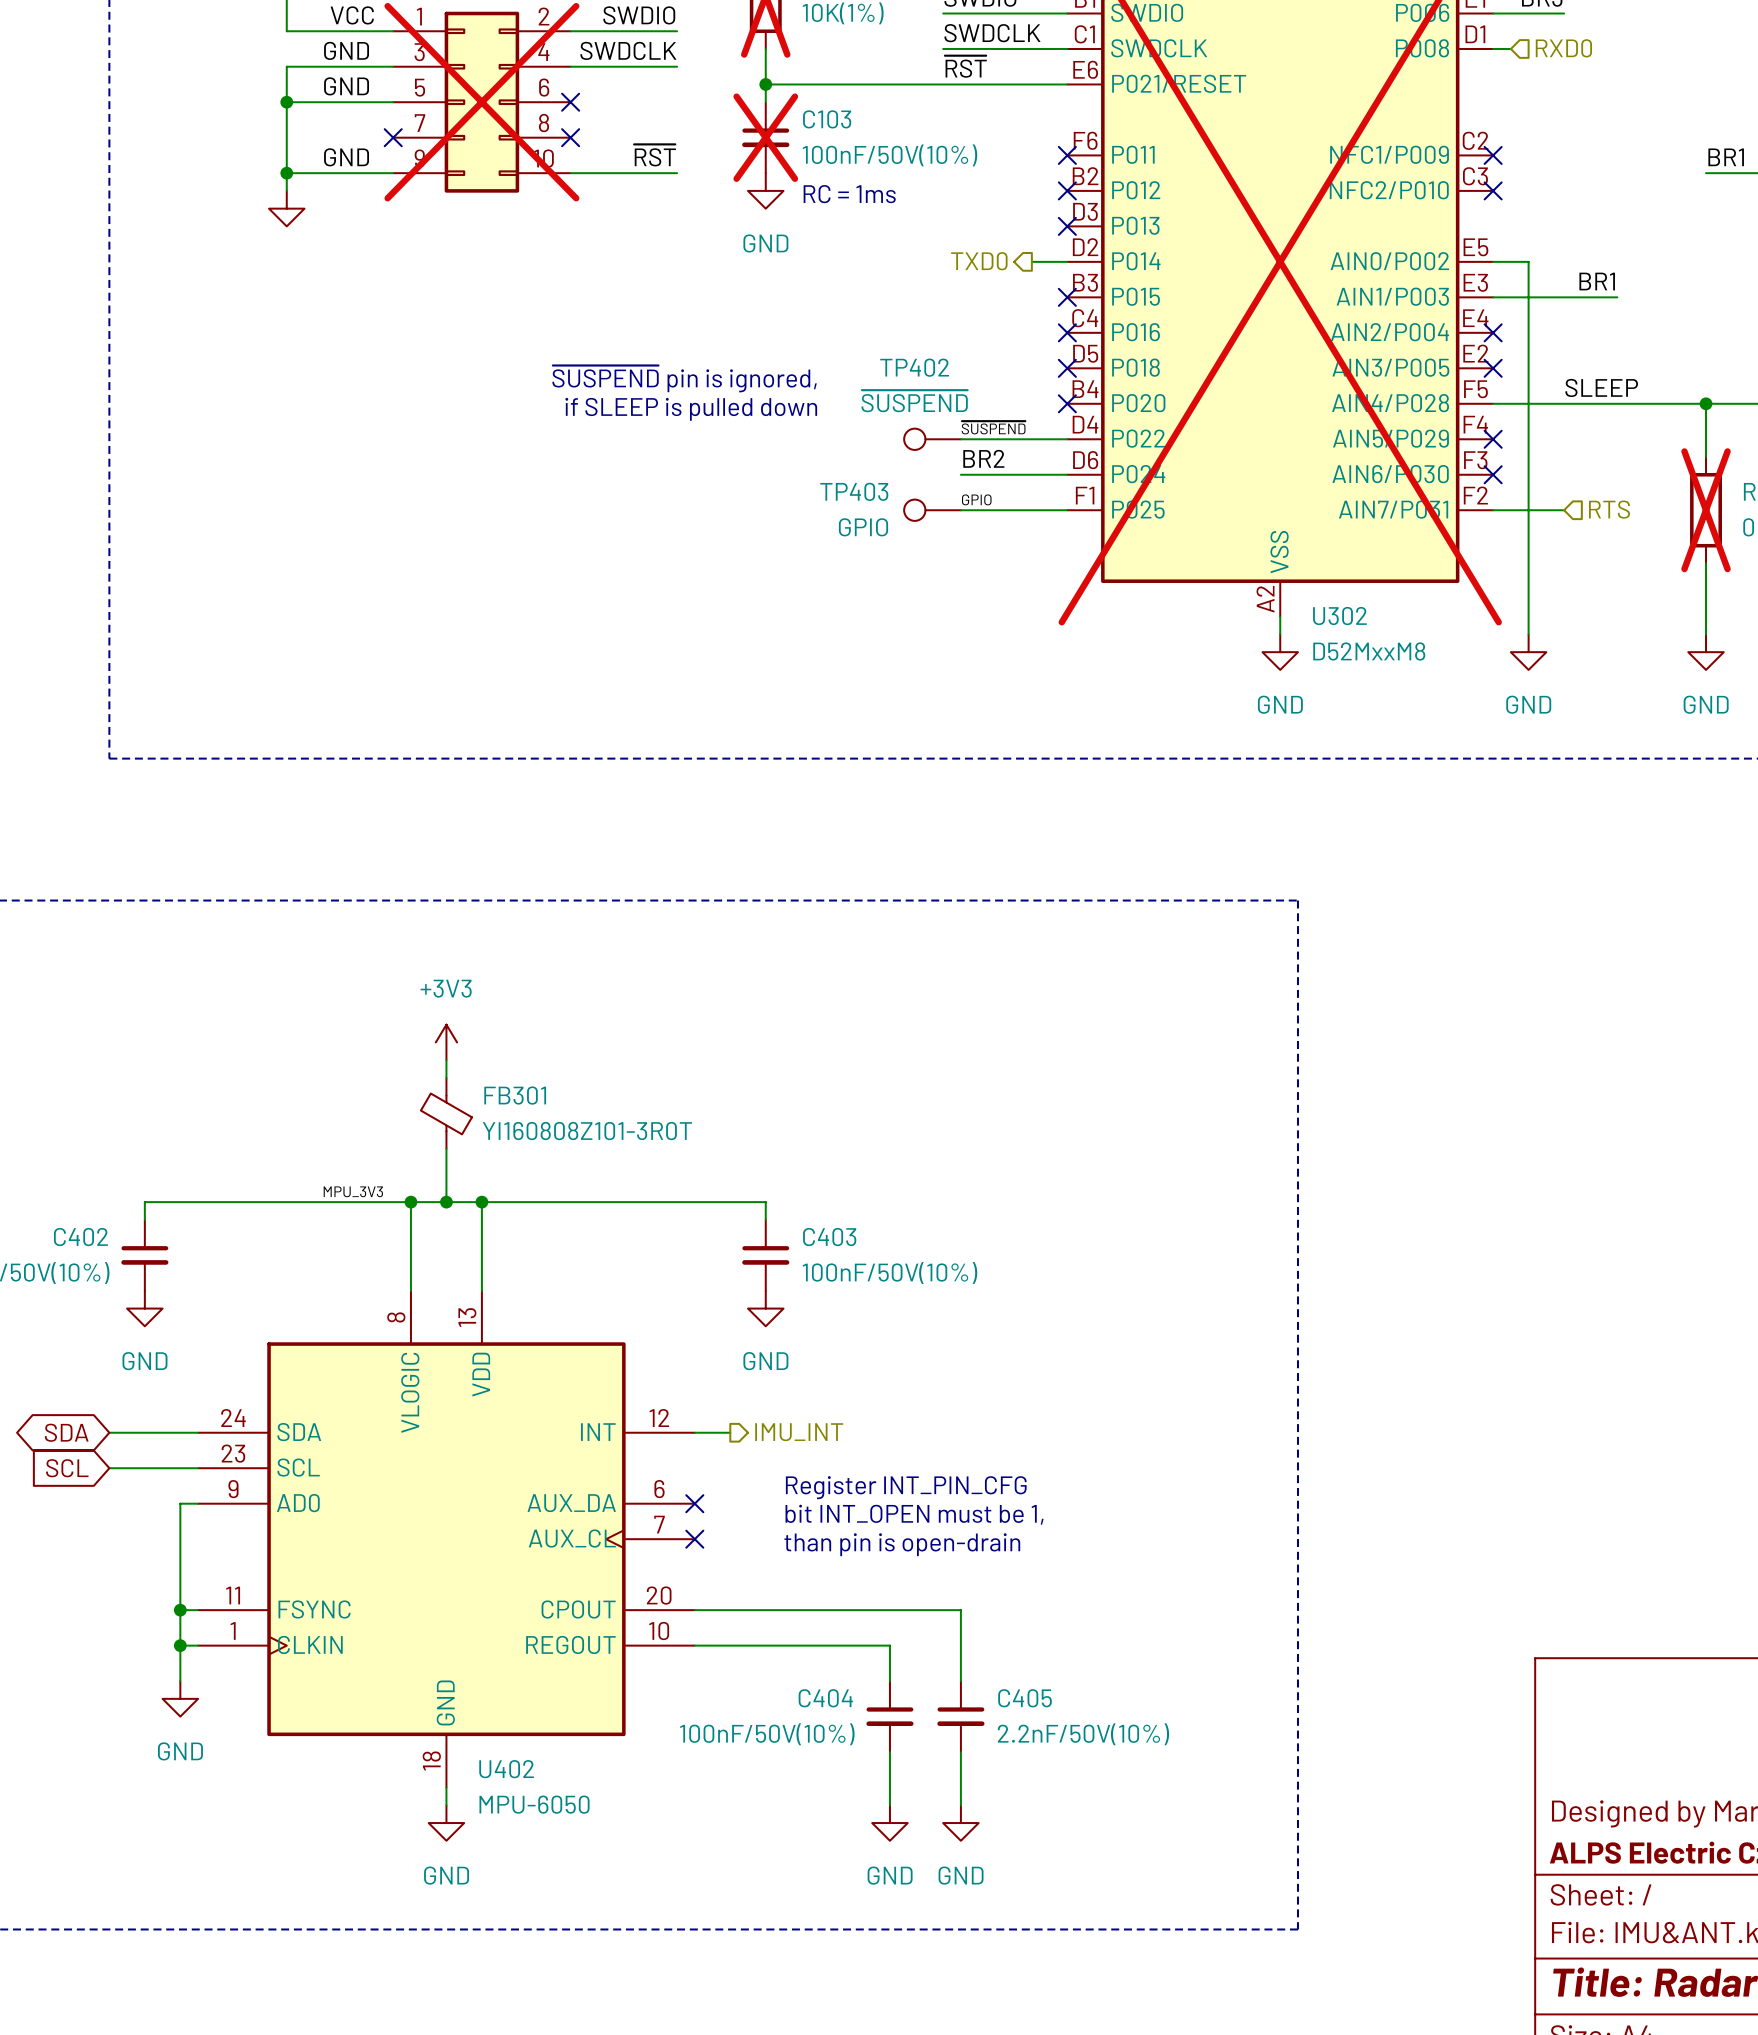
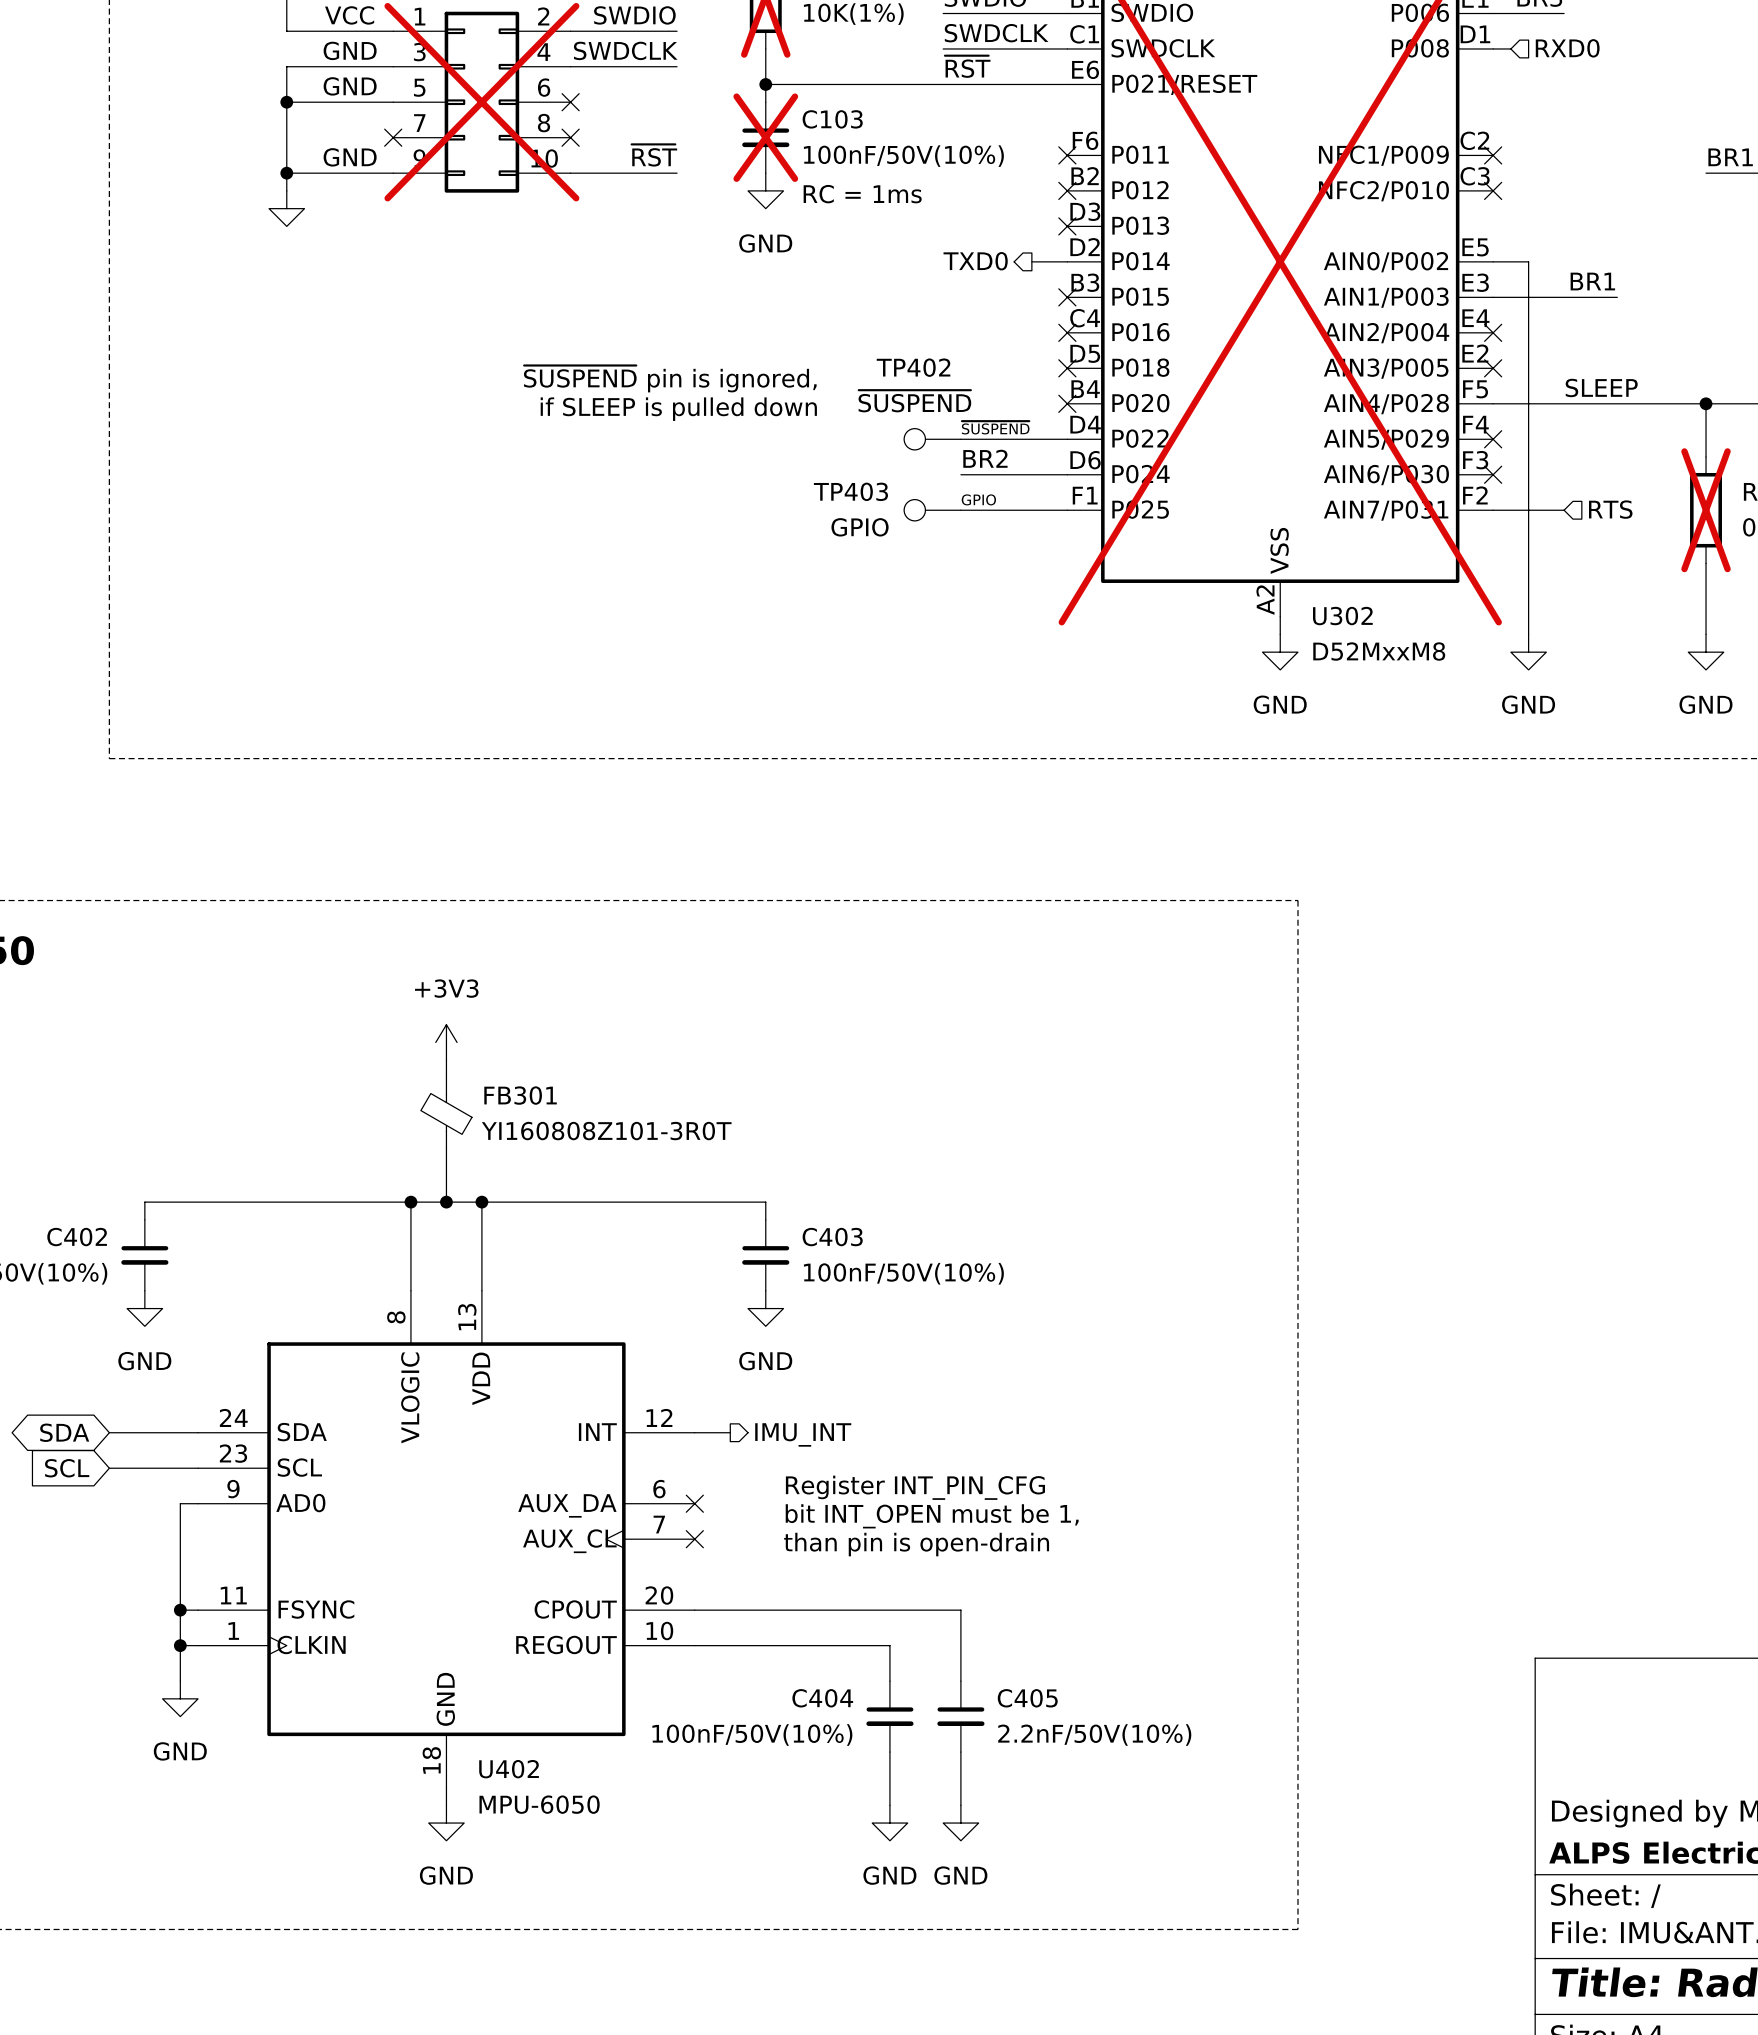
label: MPU_3V3 (353, 1191) -> none

